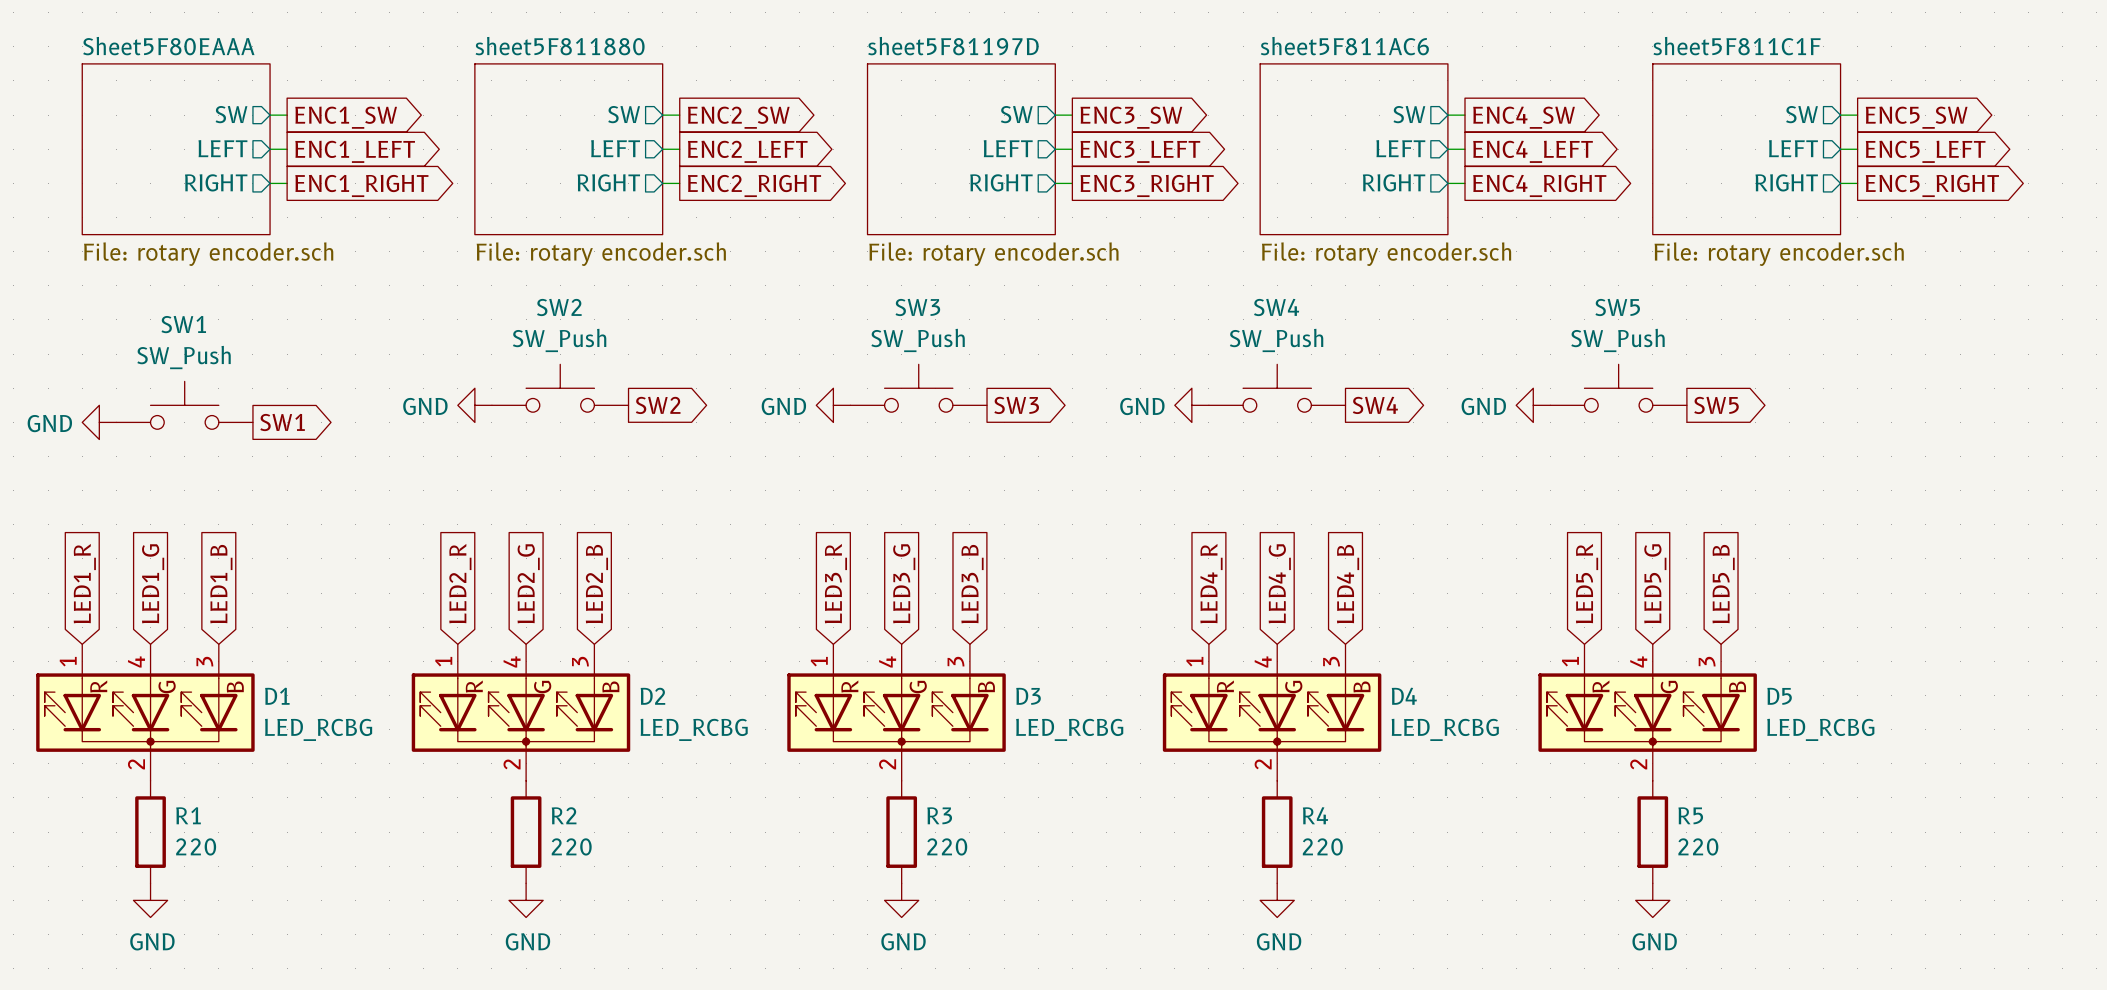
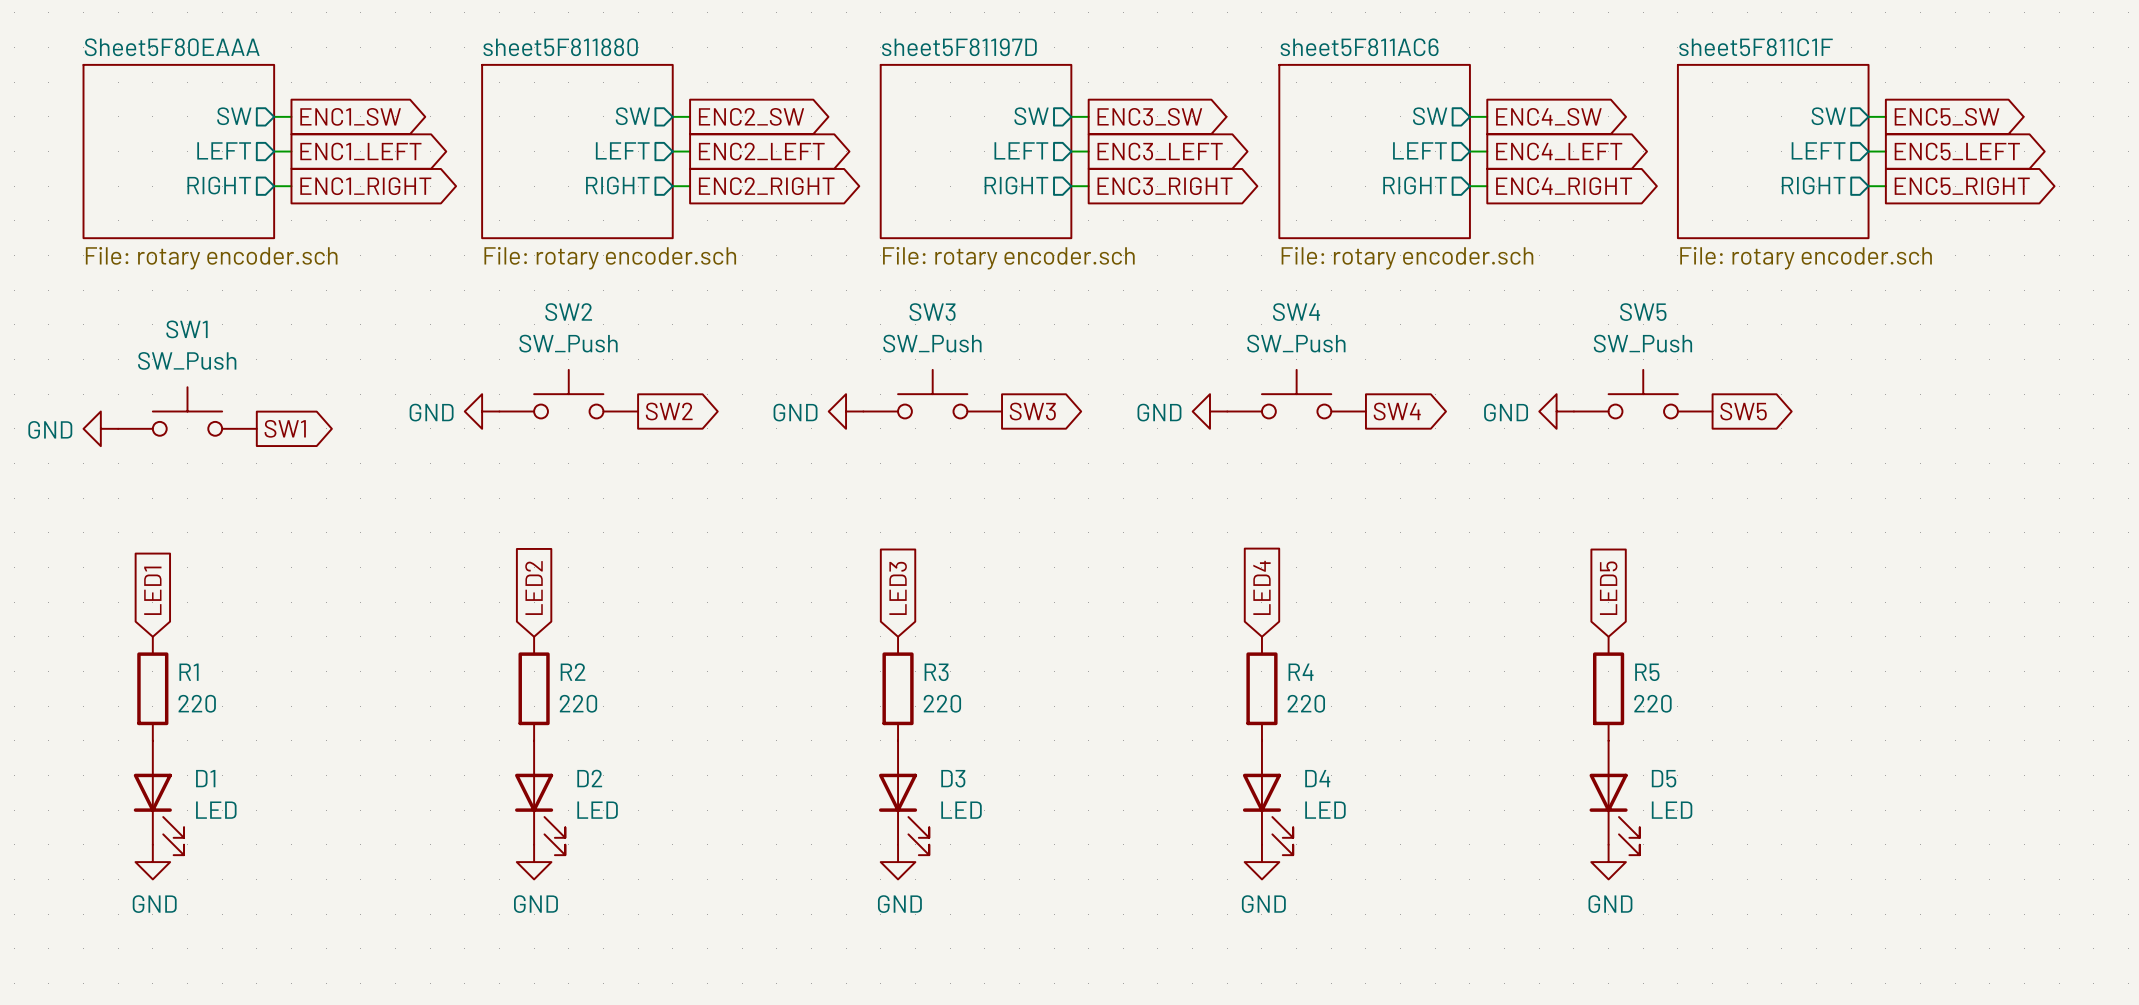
global label: none -> LED4 (1261, 587)
global label: LED1_R (84, 583) -> none
global label: LED1_G (153, 583) -> LED1 (152, 590)
global label: LED2_R (460, 583) -> none
global label: LED2_G (528, 583) -> LED2 (534, 588)
global label: LED3_R (835, 583) -> none
global label: LED3_G (904, 583) -> LED3 (898, 588)
global label: LED4_R (1211, 583) -> none
global label: LED4_G (1279, 583) -> none
global label: LED5_R (1587, 583) -> LED5 (1608, 588)
global label: LED5_G (1655, 583) -> none
global label: LED1_B (221, 584) -> none
global label: LED2_B (596, 584) -> none
global label: LED3_B (972, 584) -> none
global label: LED4_B (1348, 584) -> none
global label: LED5_B (1723, 584) -> none
D1 symbol: [36, 644, 255, 781] -> [133, 740, 185, 856]
D2 symbol: [411, 644, 631, 781] -> [515, 740, 566, 856]
D3 symbol: [787, 644, 1006, 781] -> [878, 740, 930, 856]
D4 symbol: [1162, 644, 1382, 781] -> [1242, 740, 1294, 856]
D5 symbol: [1538, 644, 1757, 781] -> [1589, 740, 1640, 856]
D1 name position: D1 (277, 696) -> D1 (205, 778)
D2 name position: D2 (652, 696) -> D2 (589, 778)
D3 name position: D3 (1028, 696) -> D3 (953, 778)
D4 name position: D4 (1404, 696) -> D4 (1317, 778)
D5 name position: D5 (1779, 696) -> D5 (1664, 778)
D1 value: LED_RCBG (318, 729) -> LED (216, 810)
D2 value: LED_RCBG (694, 729) -> LED (597, 810)
D3 value: LED_RCBG (1069, 729) -> LED (961, 810)
D4 value: LED_RCBG (1445, 729) -> LED (1325, 810)
D5 value: LED_RCBG (1820, 729) -> LED (1672, 810)
R1 position: (150, 832) -> (152, 688)
R2 position: (526, 832) -> (534, 688)
R3 position: (901, 832) -> (898, 688)
R4 position: (1277, 832) -> (1261, 688)
R5 position: (1652, 832) -> (1608, 688)
power symbol position: GND (150, 900) -> GND (152, 862)
power symbol position: GND (526, 900) -> GND (534, 862)
power symbol position: GND (901, 900) -> GND (898, 862)
power symbol position: GND (1277, 900) -> GND (1261, 862)
power symbol position: GND (1652, 900) -> GND (1608, 862)

